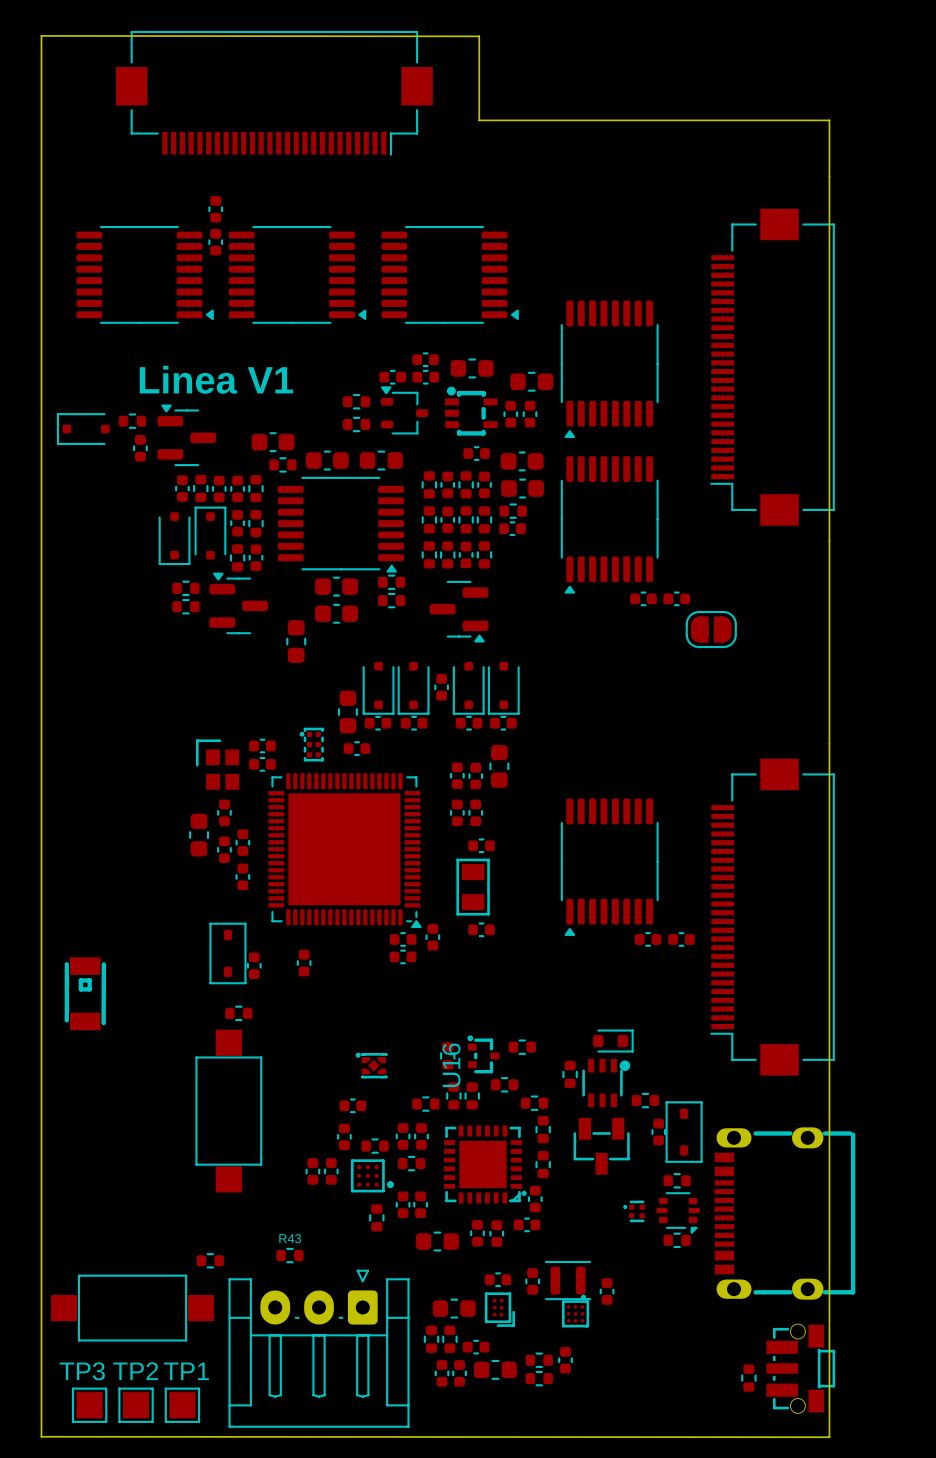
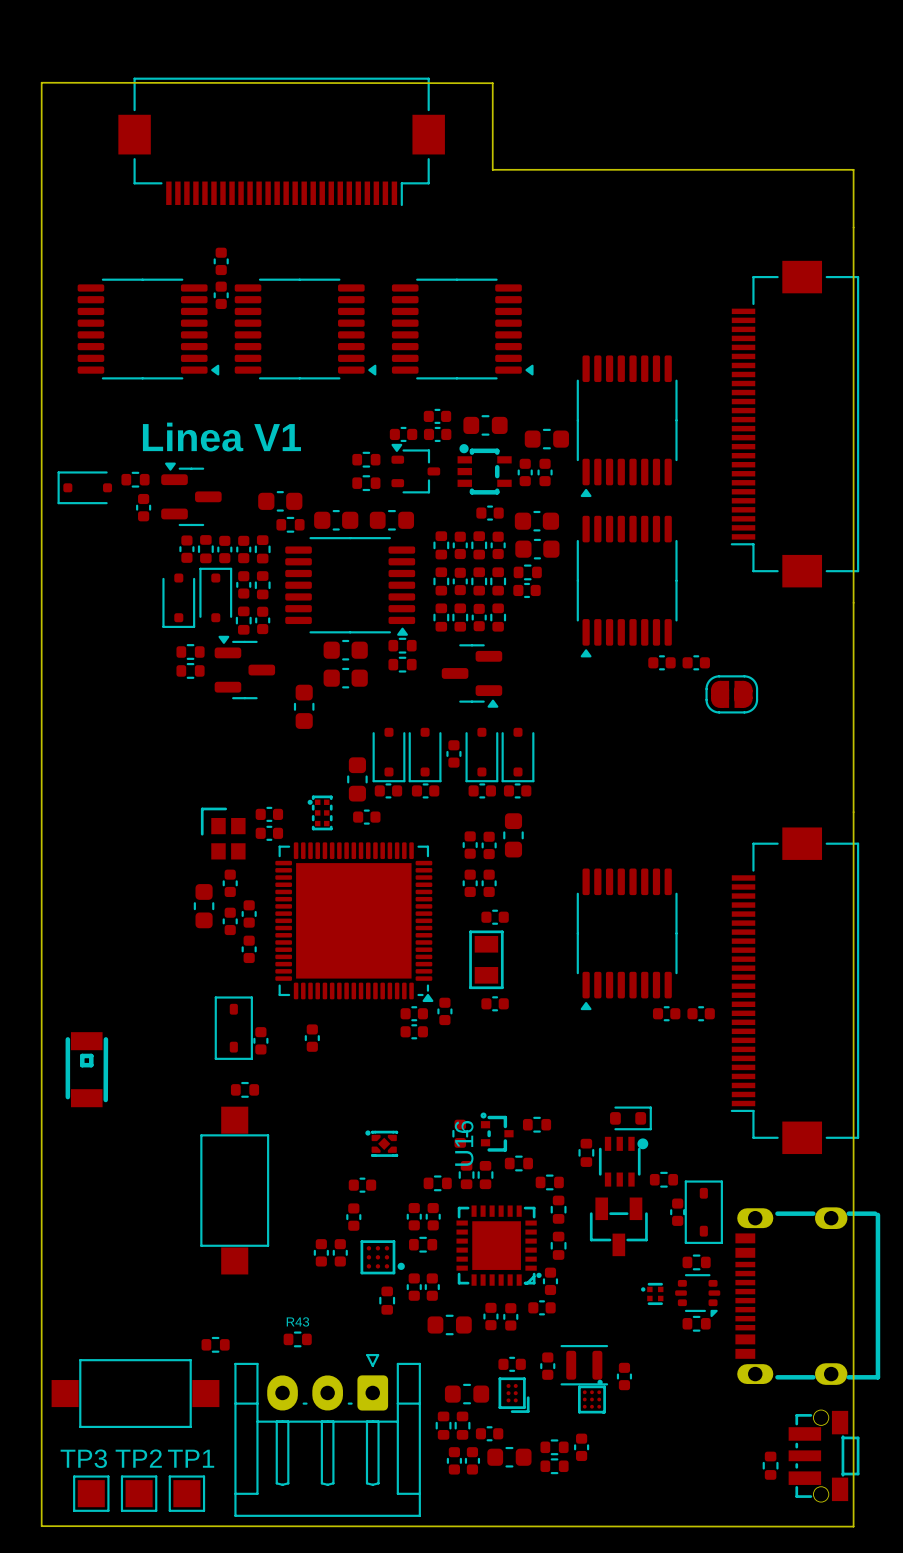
part: (375, 1146) -> none

